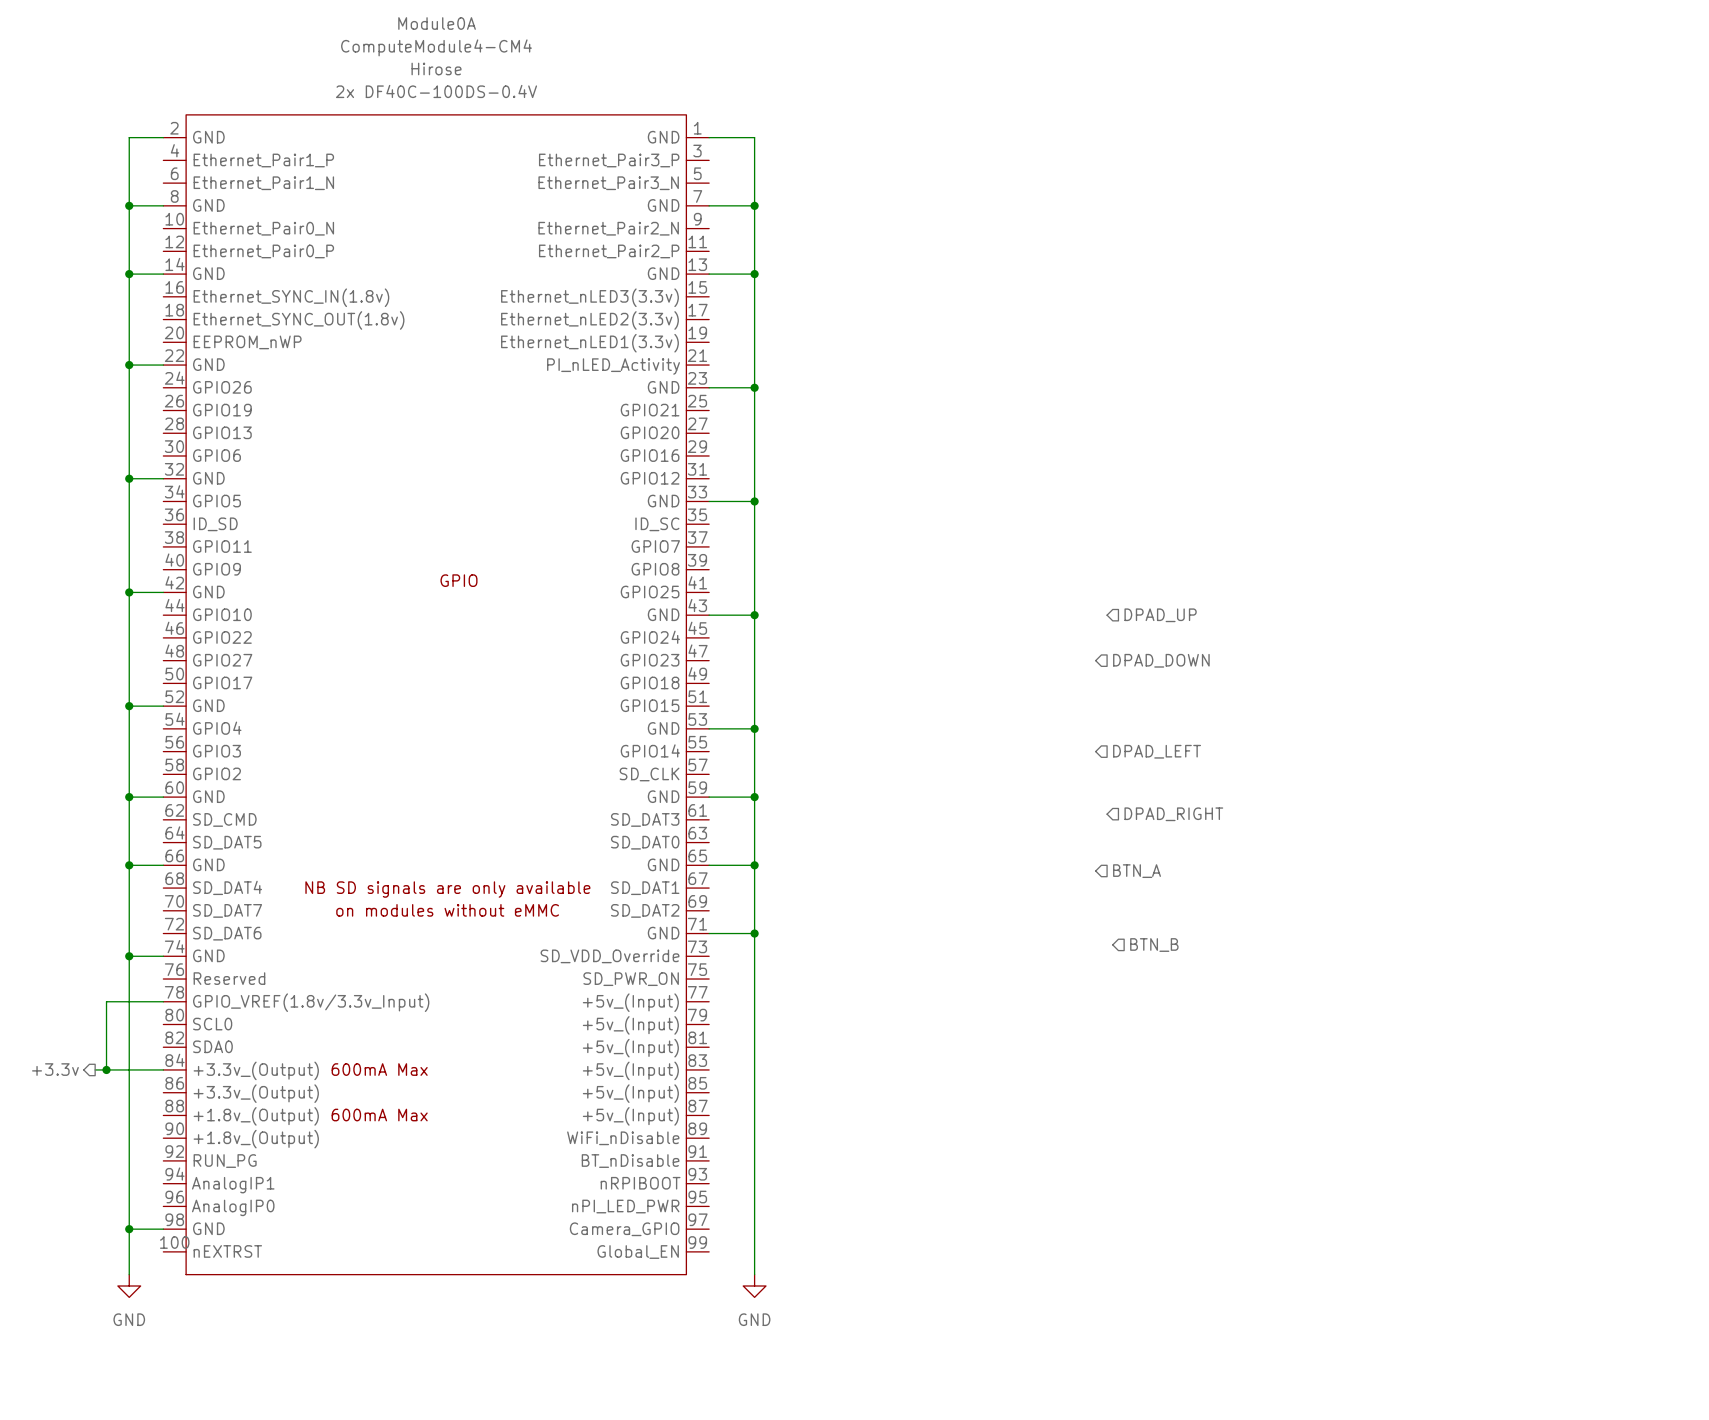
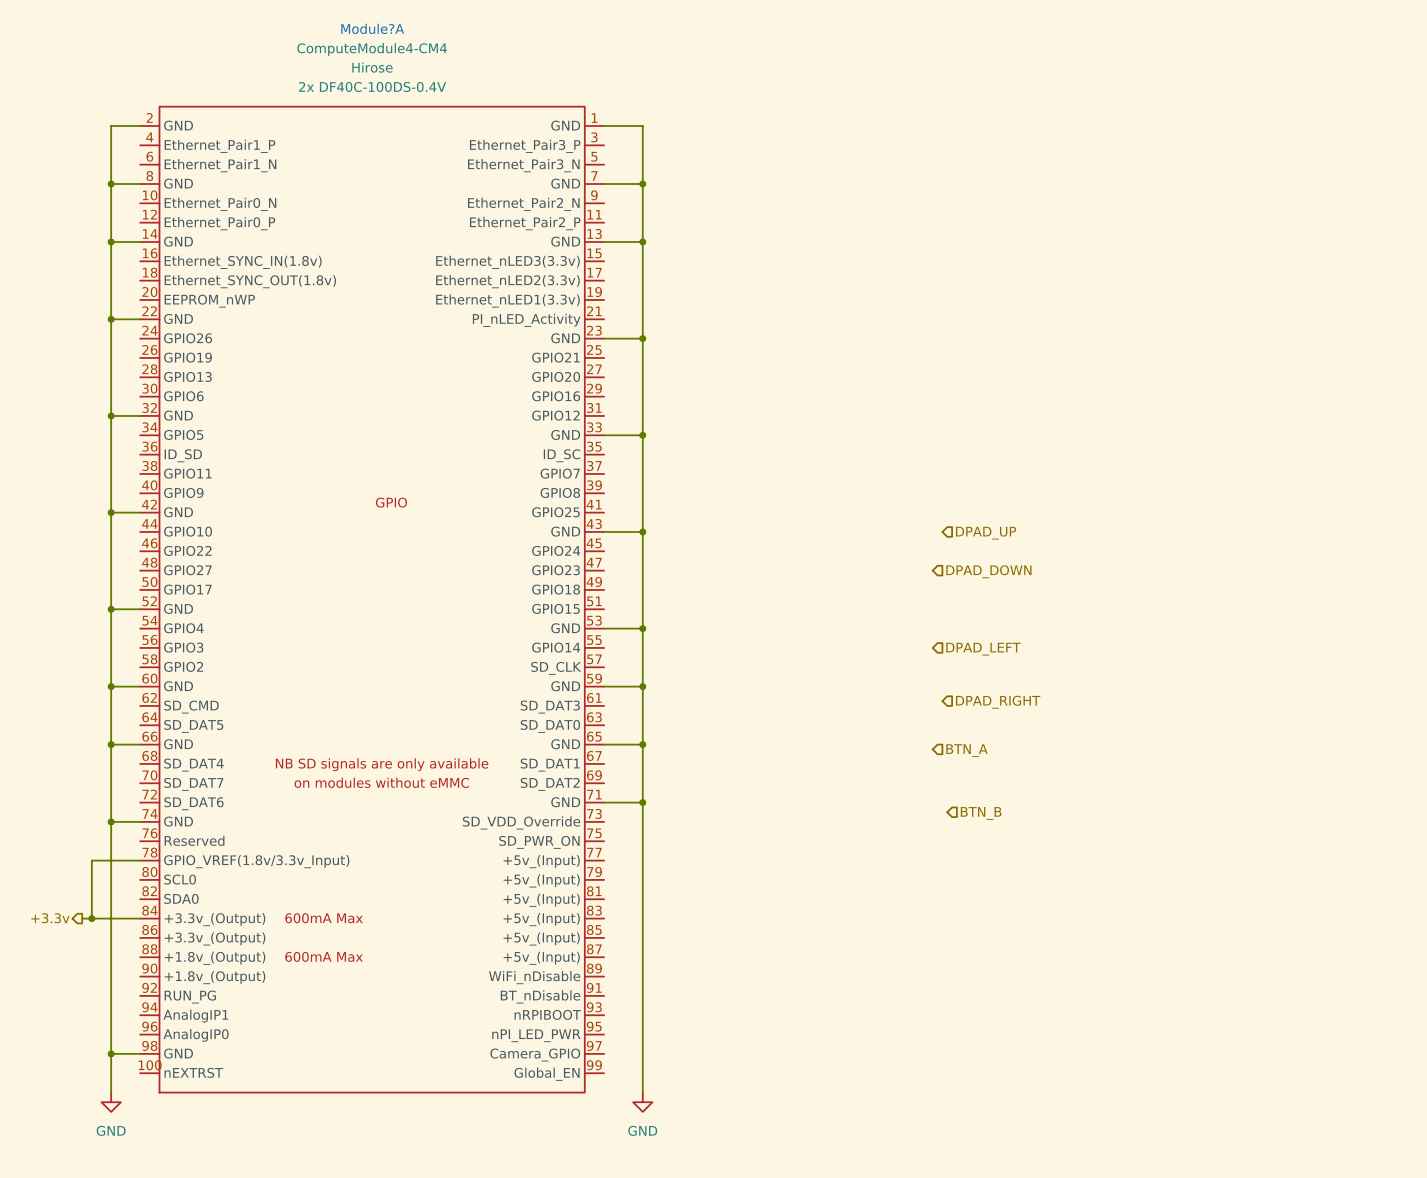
Module0A name: Module0A (437, 23) -> Module?A (372, 28)

